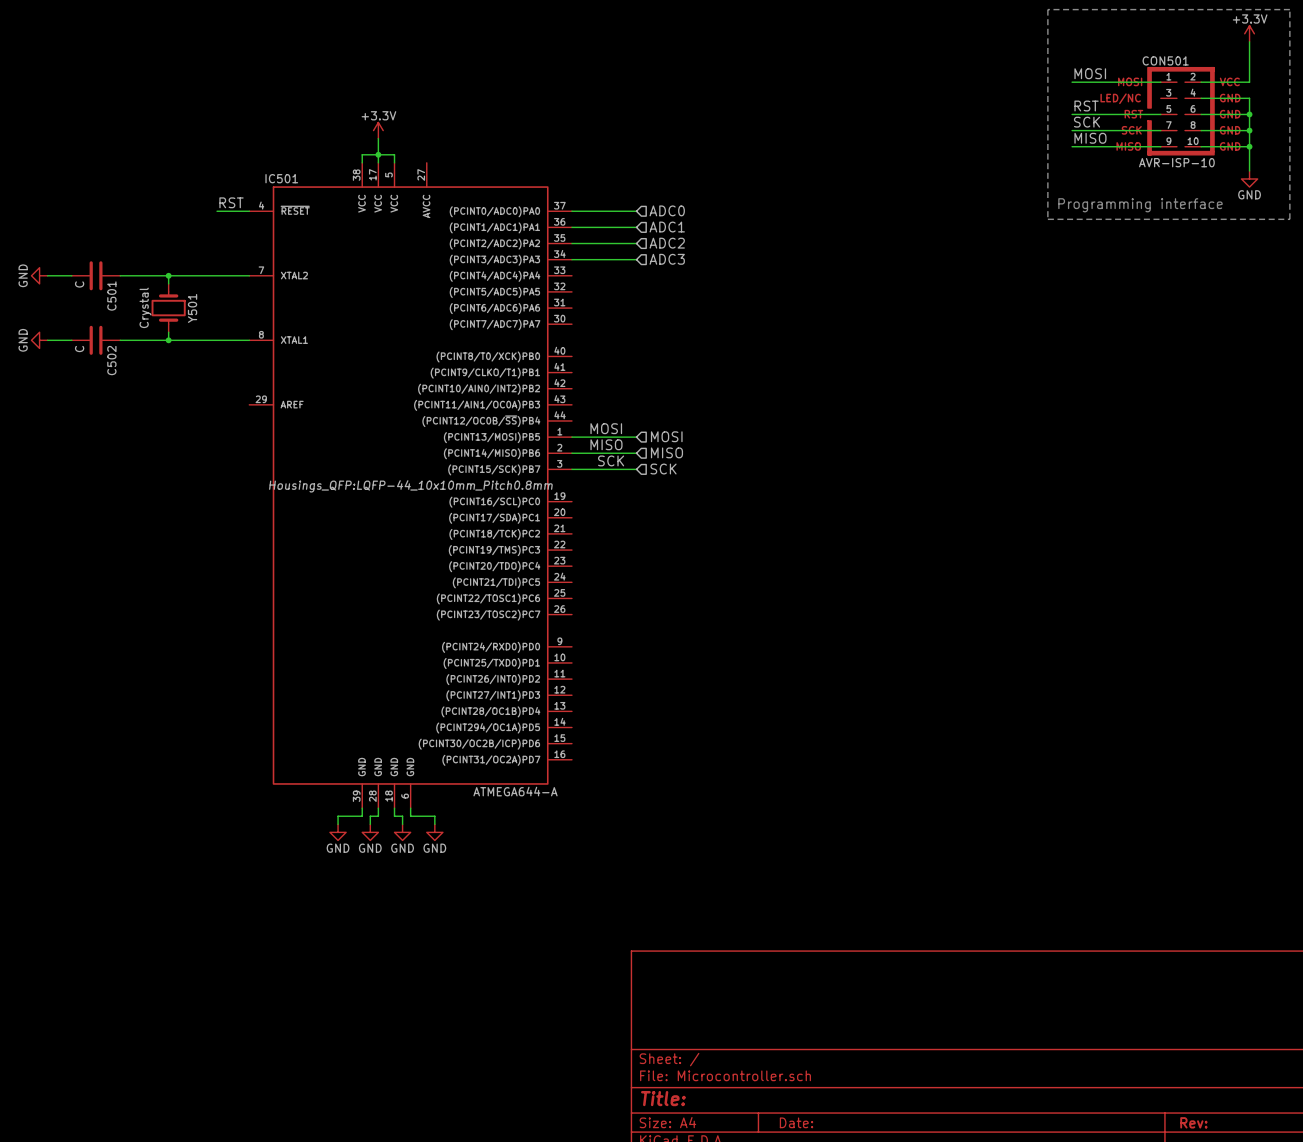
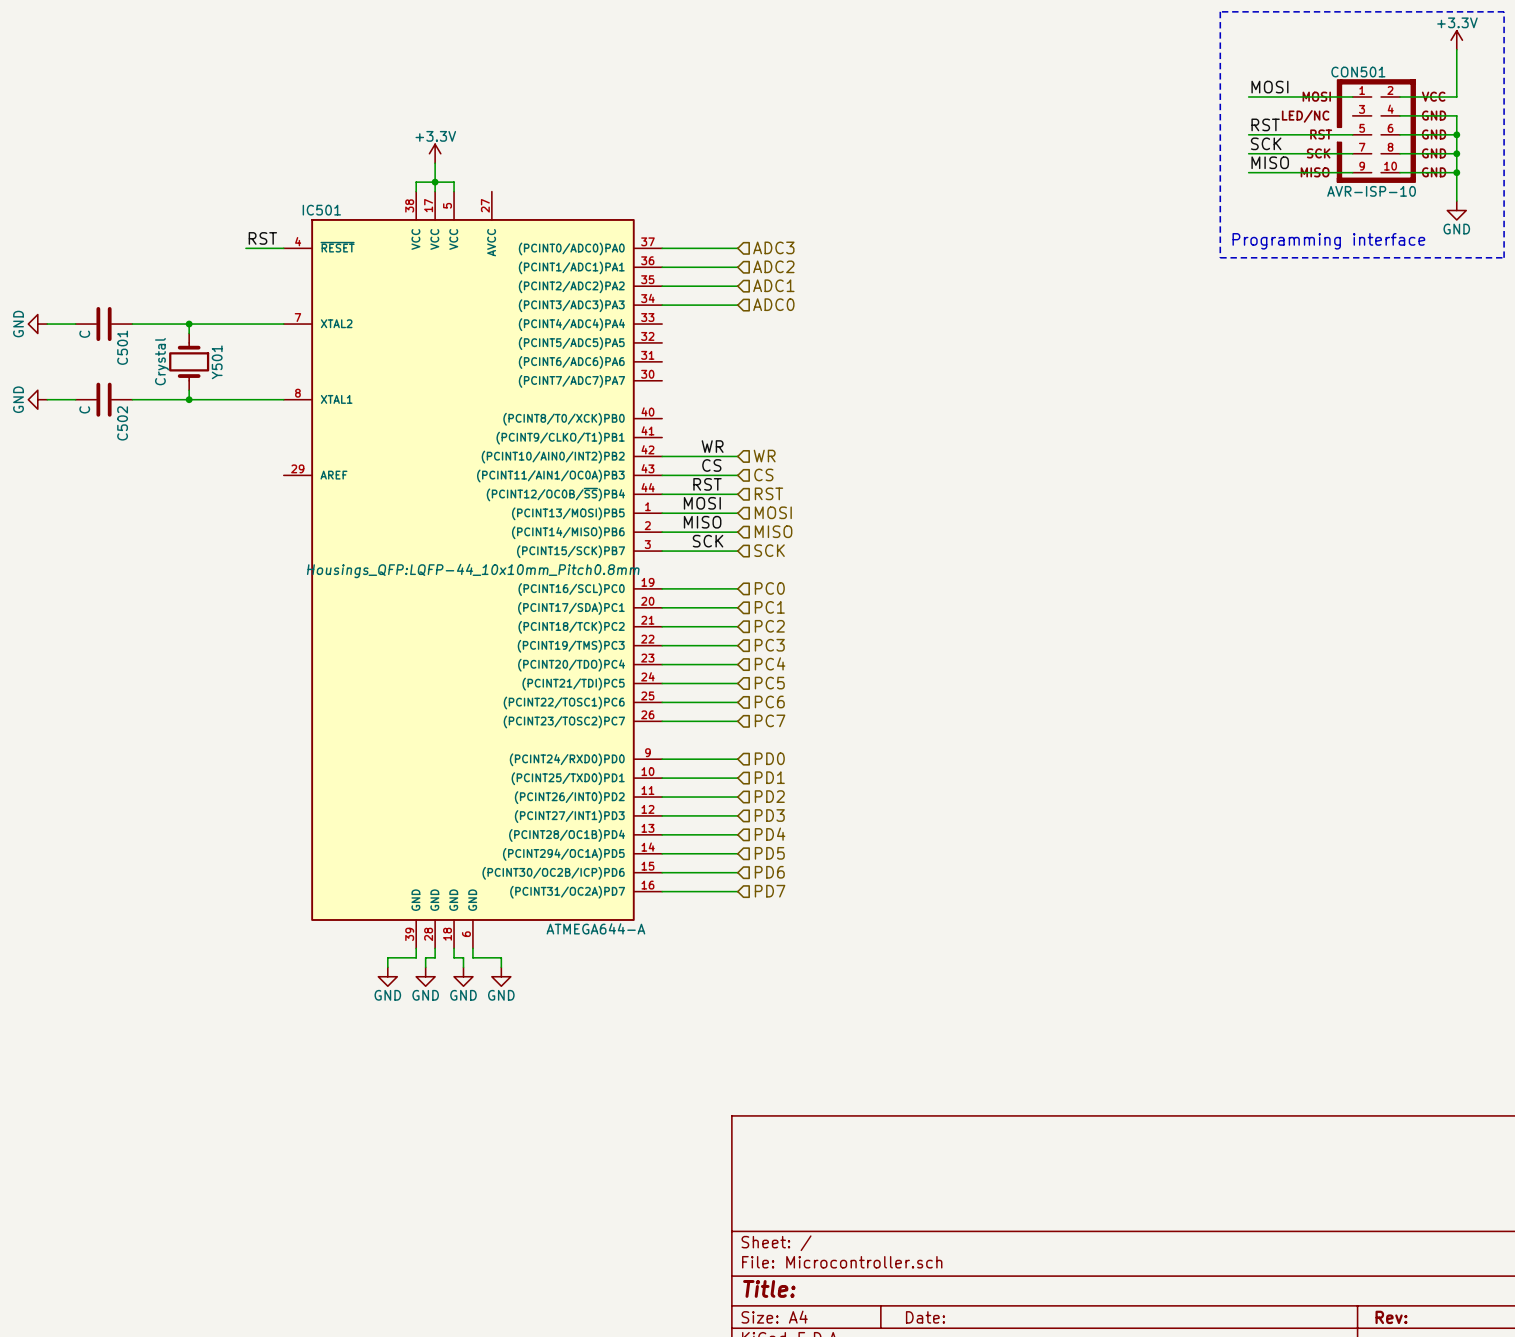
hierarchical label: ADC0 (667, 210) -> ADC3 (773, 247)
hierarchical label: ADC1 (667, 227) -> ADC2 (773, 266)
hierarchical label: ADC2 (667, 243) -> ADC1 (773, 285)
hierarchical label: ADC3 (667, 259) -> ADC0 (773, 304)
label: none -> WR (712, 446)
wire: none -> (662, 456) (737, 456)
hierarchical label: none -> WR (764, 456)
label: none -> CS (711, 465)
wire: none -> (662, 475) (737, 475)
hierarchical label: none -> CS (763, 474)
label: none -> RST (707, 484)
wire: none -> (662, 494) (737, 494)
hierarchical label: none -> RST (768, 493)
wire: none -> (662, 588) (737, 588)
hierarchical label: none -> PC0 (769, 588)
wire: none -> (662, 607) (737, 607)
hierarchical label: none -> PC1 (769, 607)
wire: none -> (662, 626) (737, 626)
hierarchical label: none -> PC2 (769, 626)
hierarchical label: none -> PC3 (769, 645)
wire: none -> (662, 645) (737, 645)
hierarchical label: none -> PC4 (770, 663)
wire: none -> (662, 664) (737, 664)
hierarchical label: none -> PC5 (769, 683)
wire: none -> (662, 683) (737, 683)
wire: none -> (662, 702) (737, 702)
hierarchical label: none -> PC6 (769, 701)
wire: none -> (662, 721) (737, 721)
hierarchical label: none -> PC7 (770, 720)
wire: none -> (662, 759) (737, 759)
hierarchical label: none -> PD0 (769, 758)
wire: none -> (662, 778) (737, 778)
hierarchical label: none -> PD1 (769, 777)
hierarchical label: none -> PD2 (769, 796)
wire: none -> (662, 797) (737, 797)
hierarchical label: none -> PD3 (769, 815)
wire: none -> (662, 815) (737, 815)
hierarchical label: none -> PD4 (770, 834)
wire: none -> (662, 834) (737, 834)
wire: none -> (662, 853) (737, 853)
hierarchical label: none -> PD5 (769, 853)
wire: none -> (662, 872) (737, 872)
hierarchical label: none -> PD6 (769, 872)
wire: none -> (662, 891) (737, 891)
hierarchical label: none -> PD7 (770, 891)

